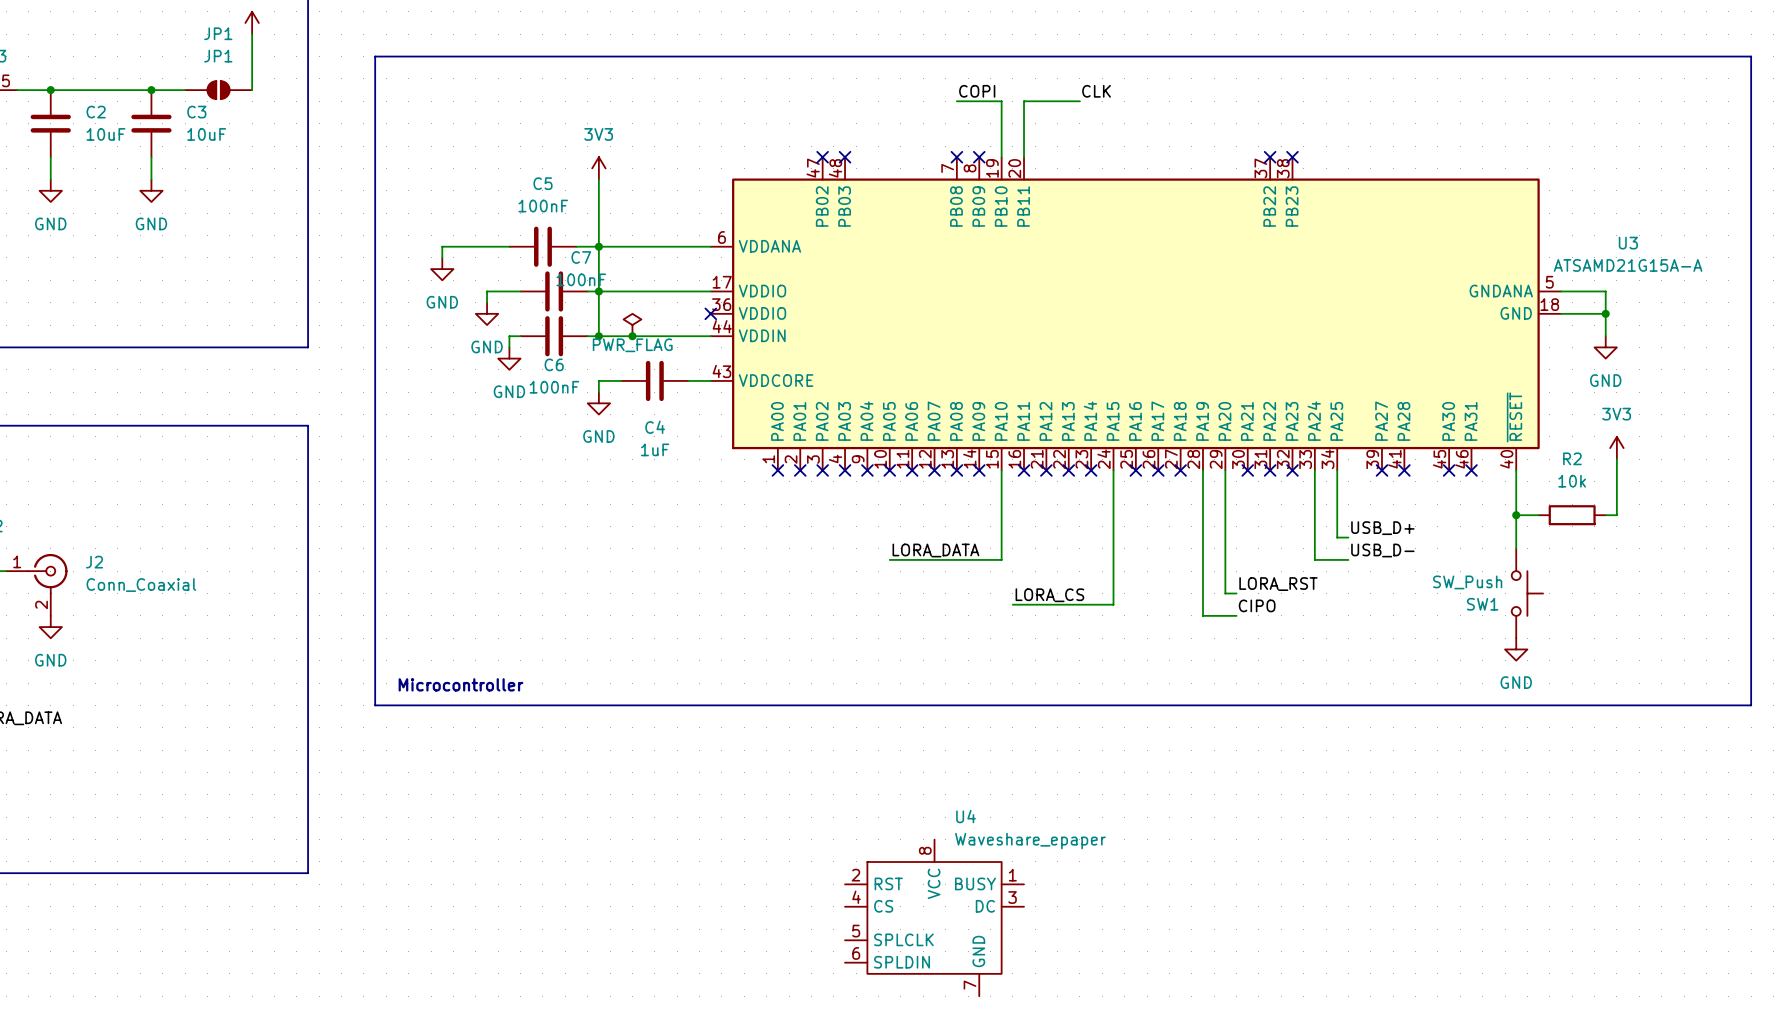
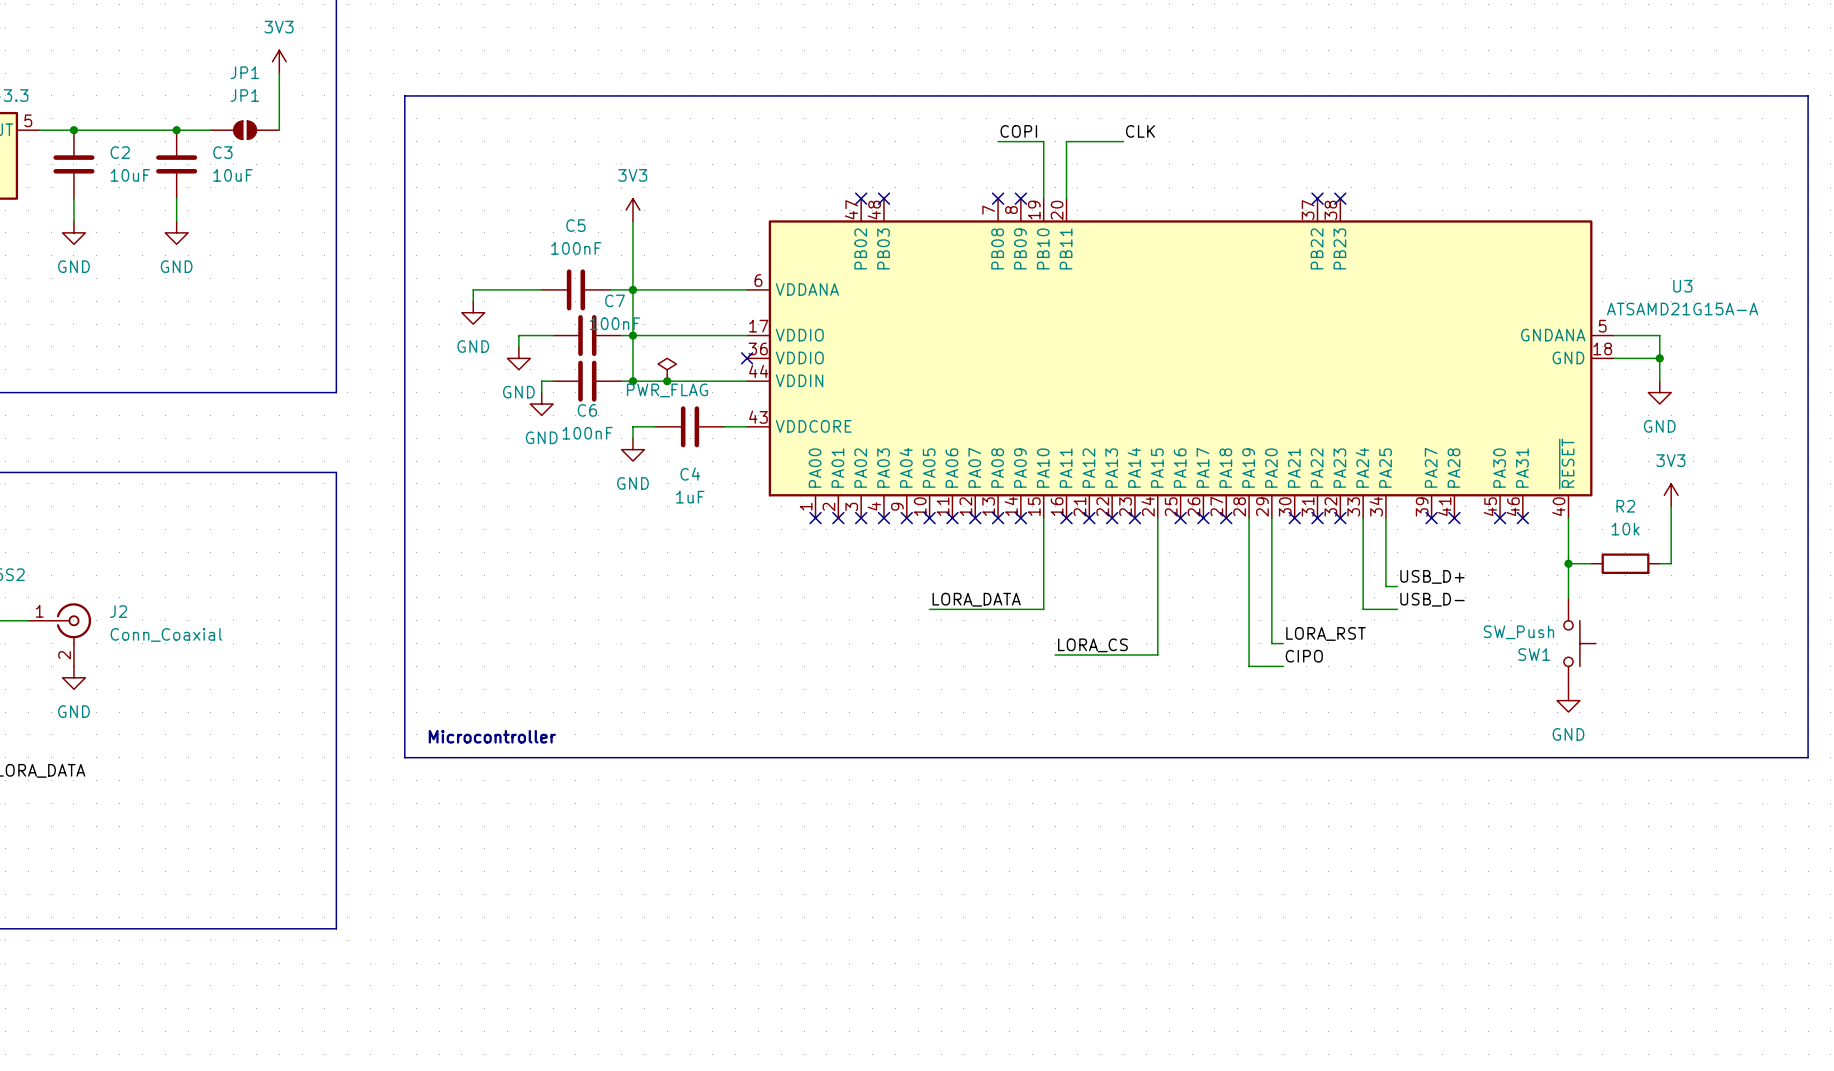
U4: Waveshare_epaper (934, 917) -> none

